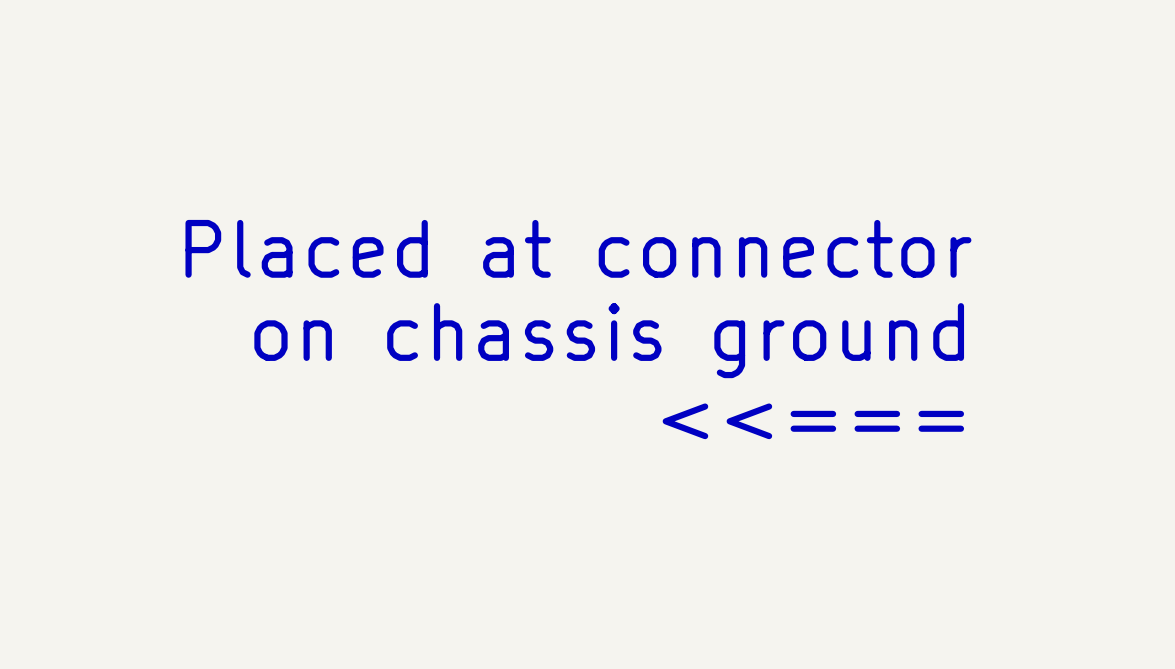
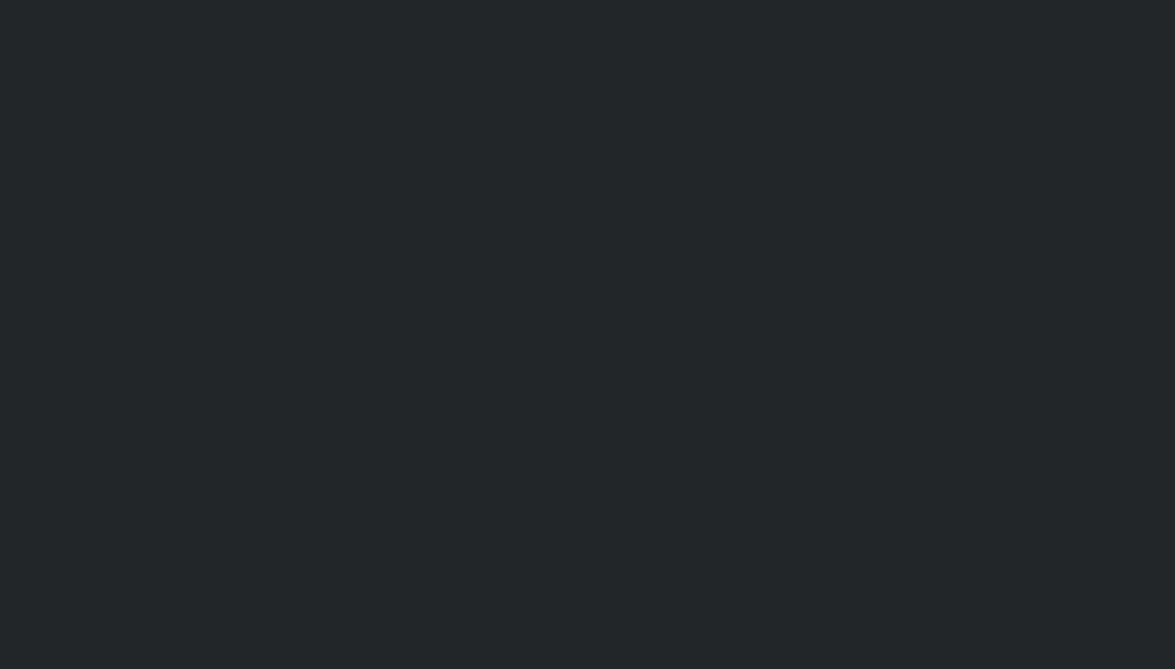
text: Placed at connector (578, 248) -> none
text: on chassis ground (609, 340) -> none
text: <<=== (813, 421) -> none

